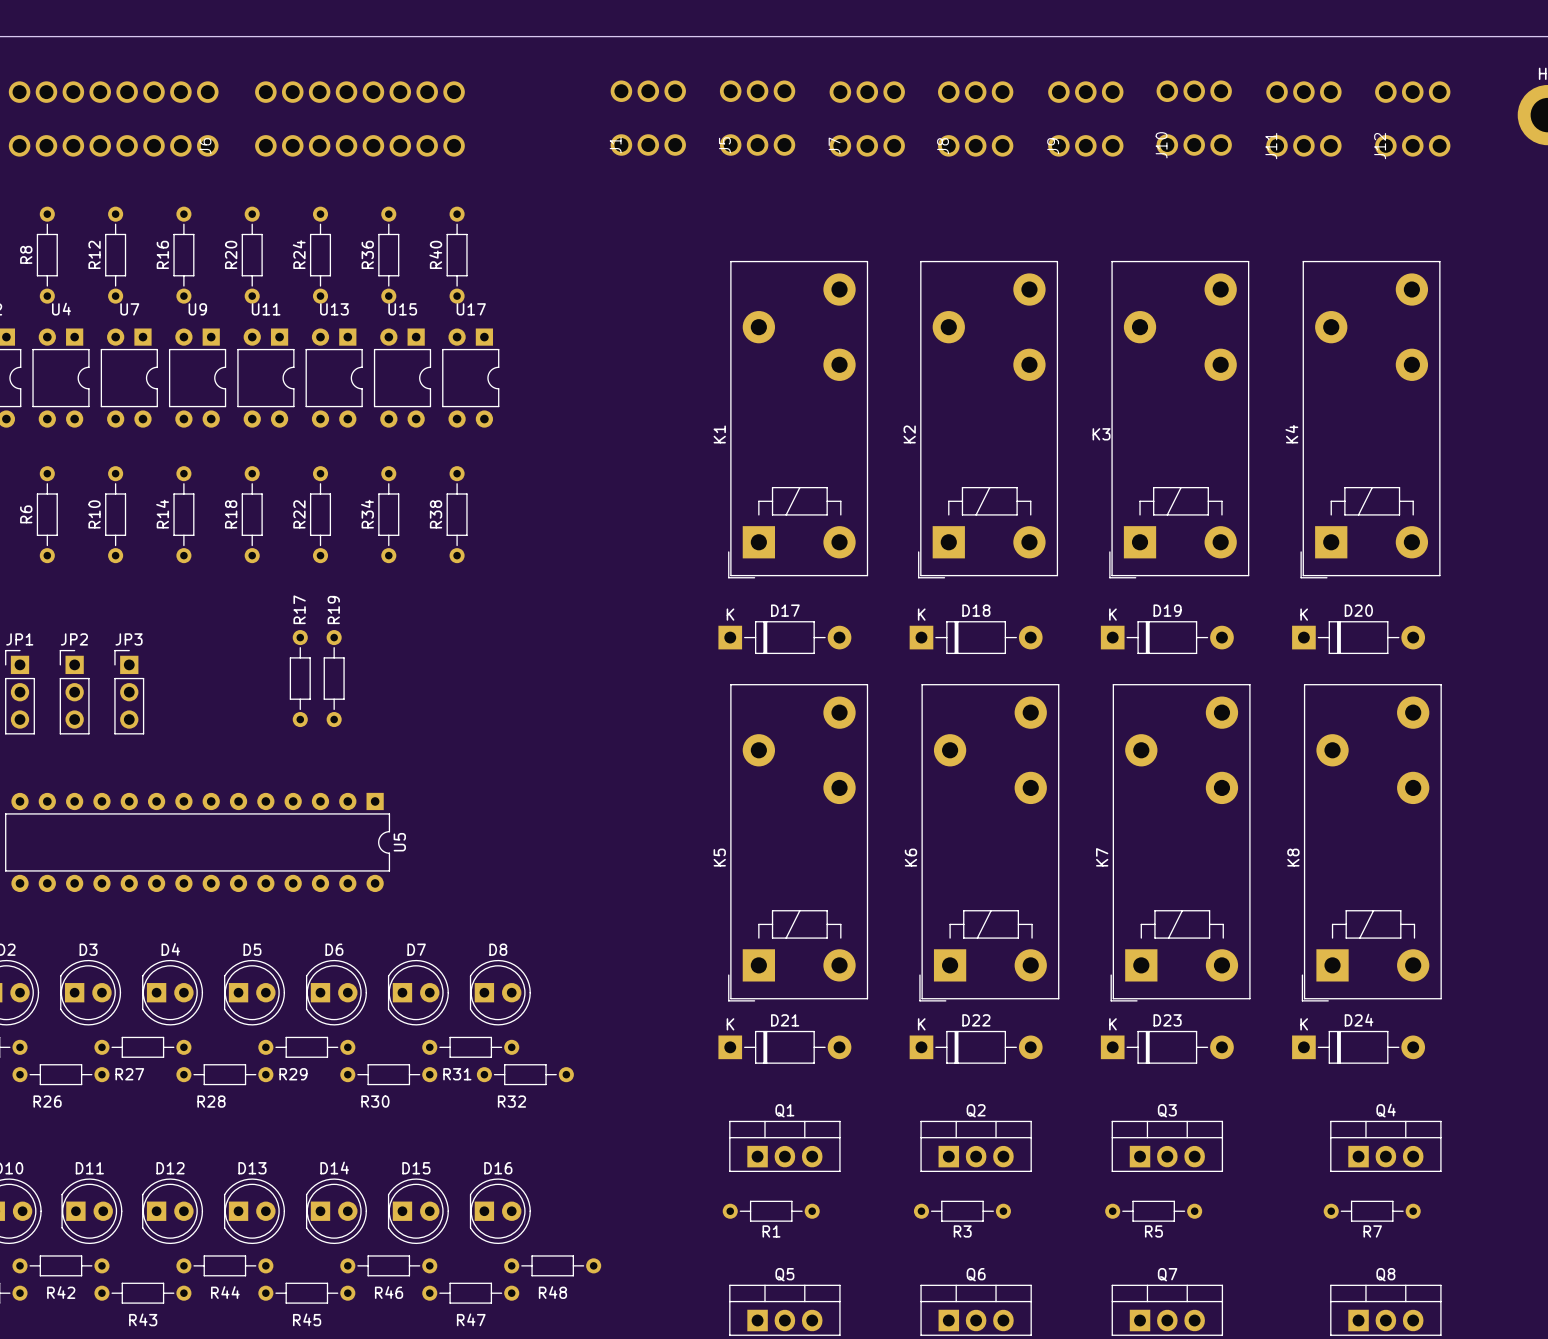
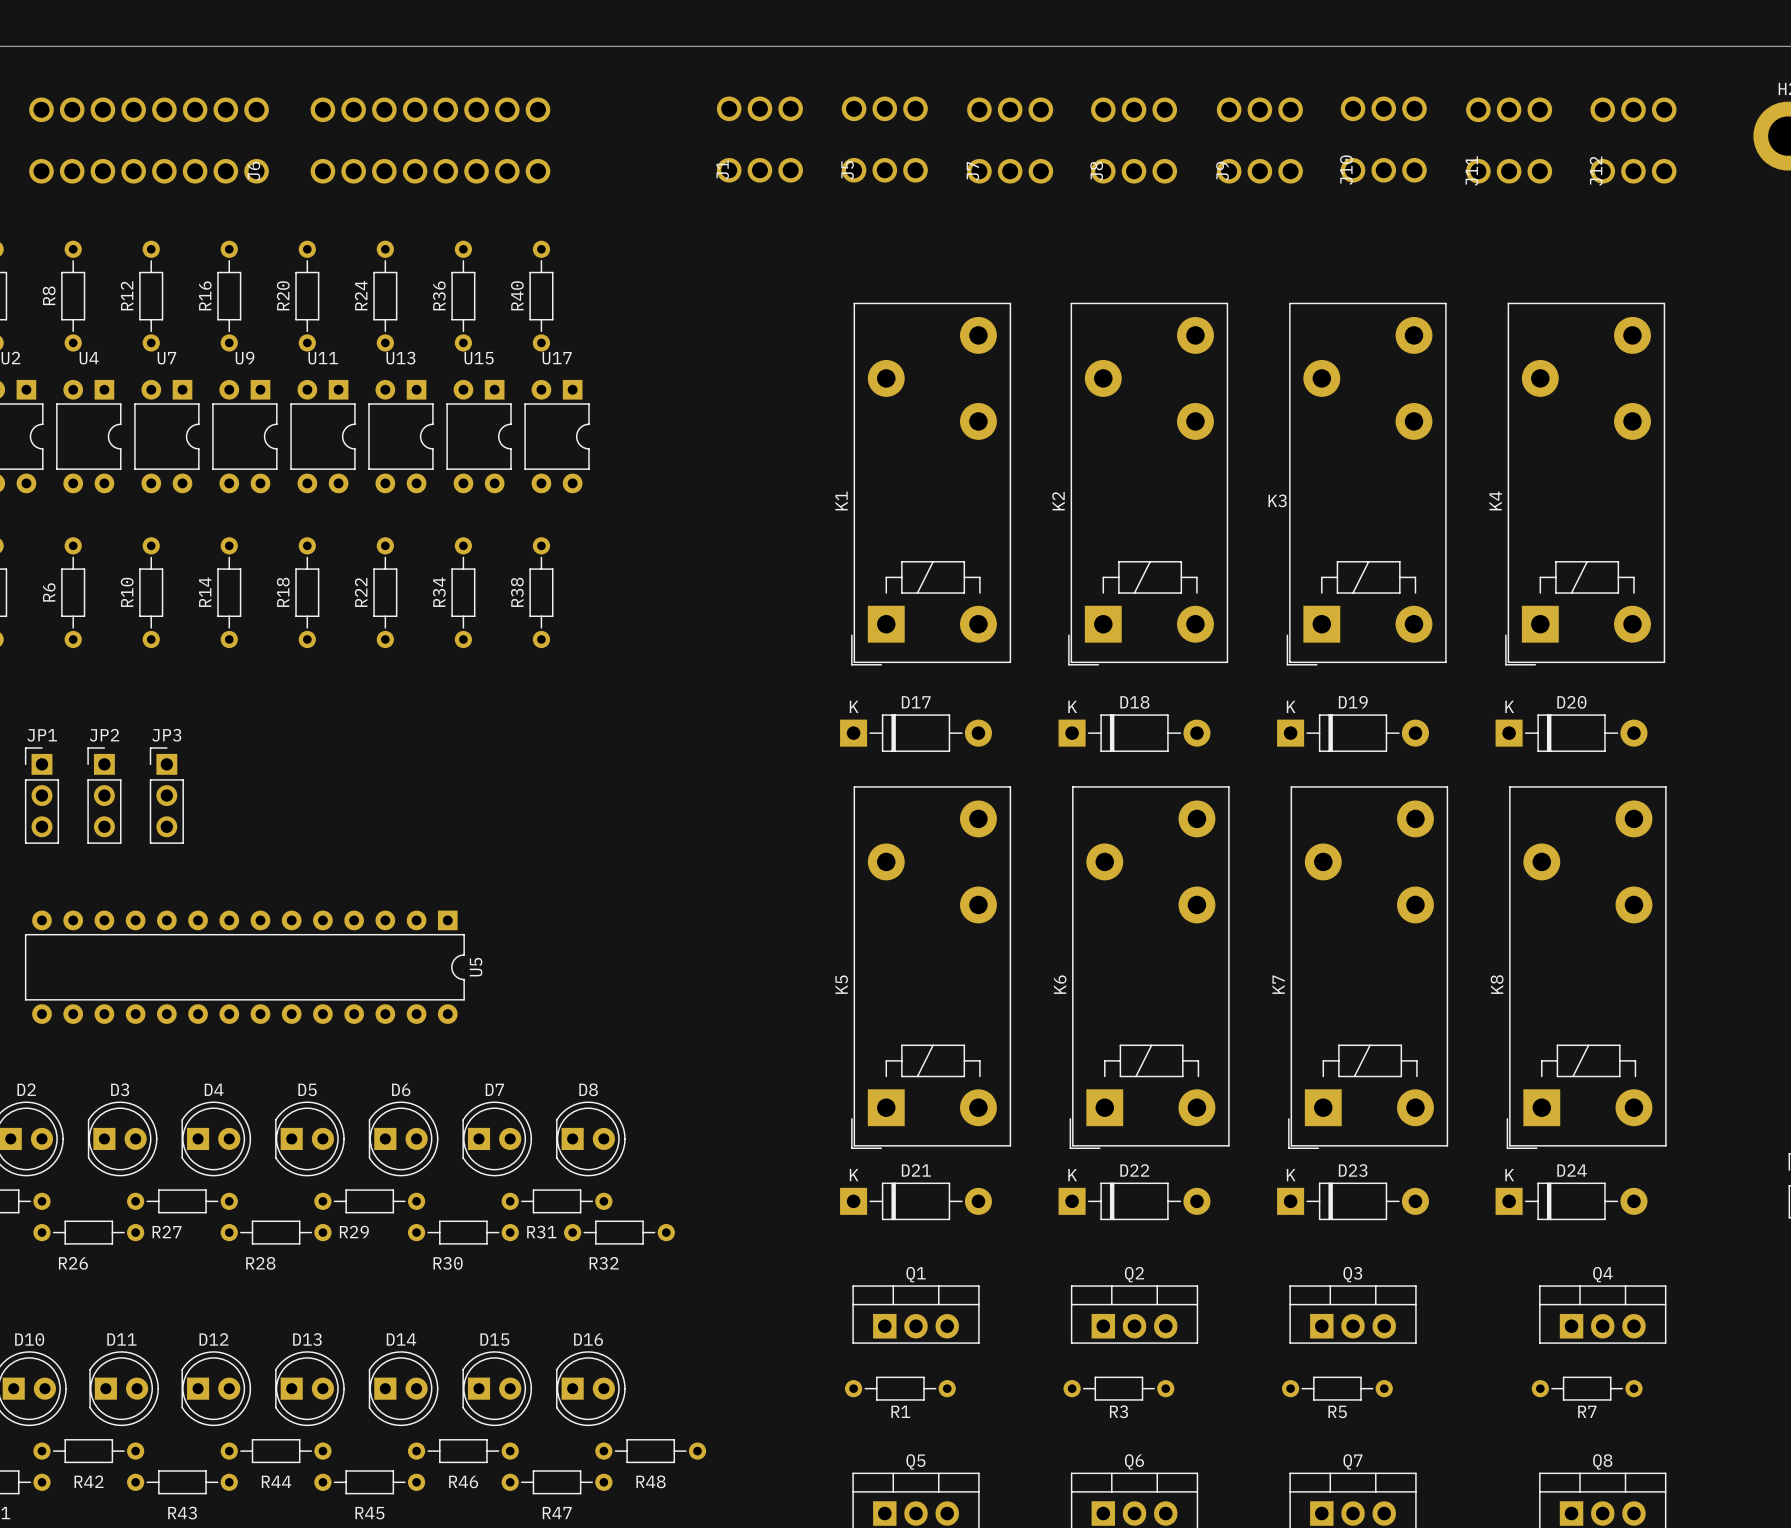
R17: (300, 678) -> none
R19: (334, 678) -> none

